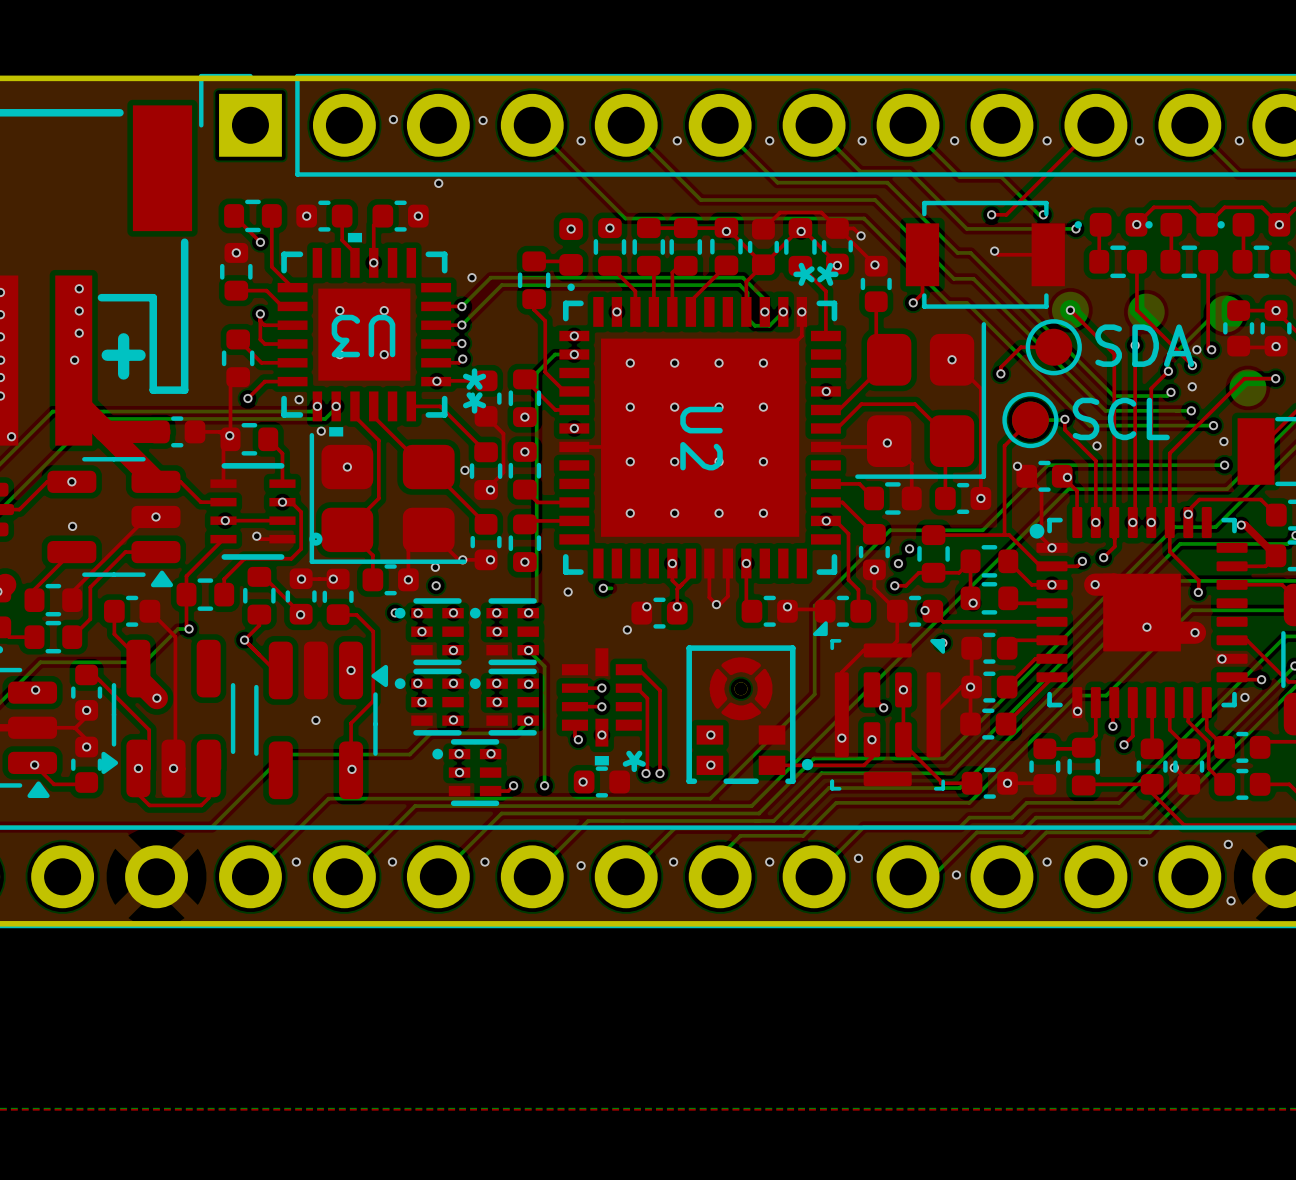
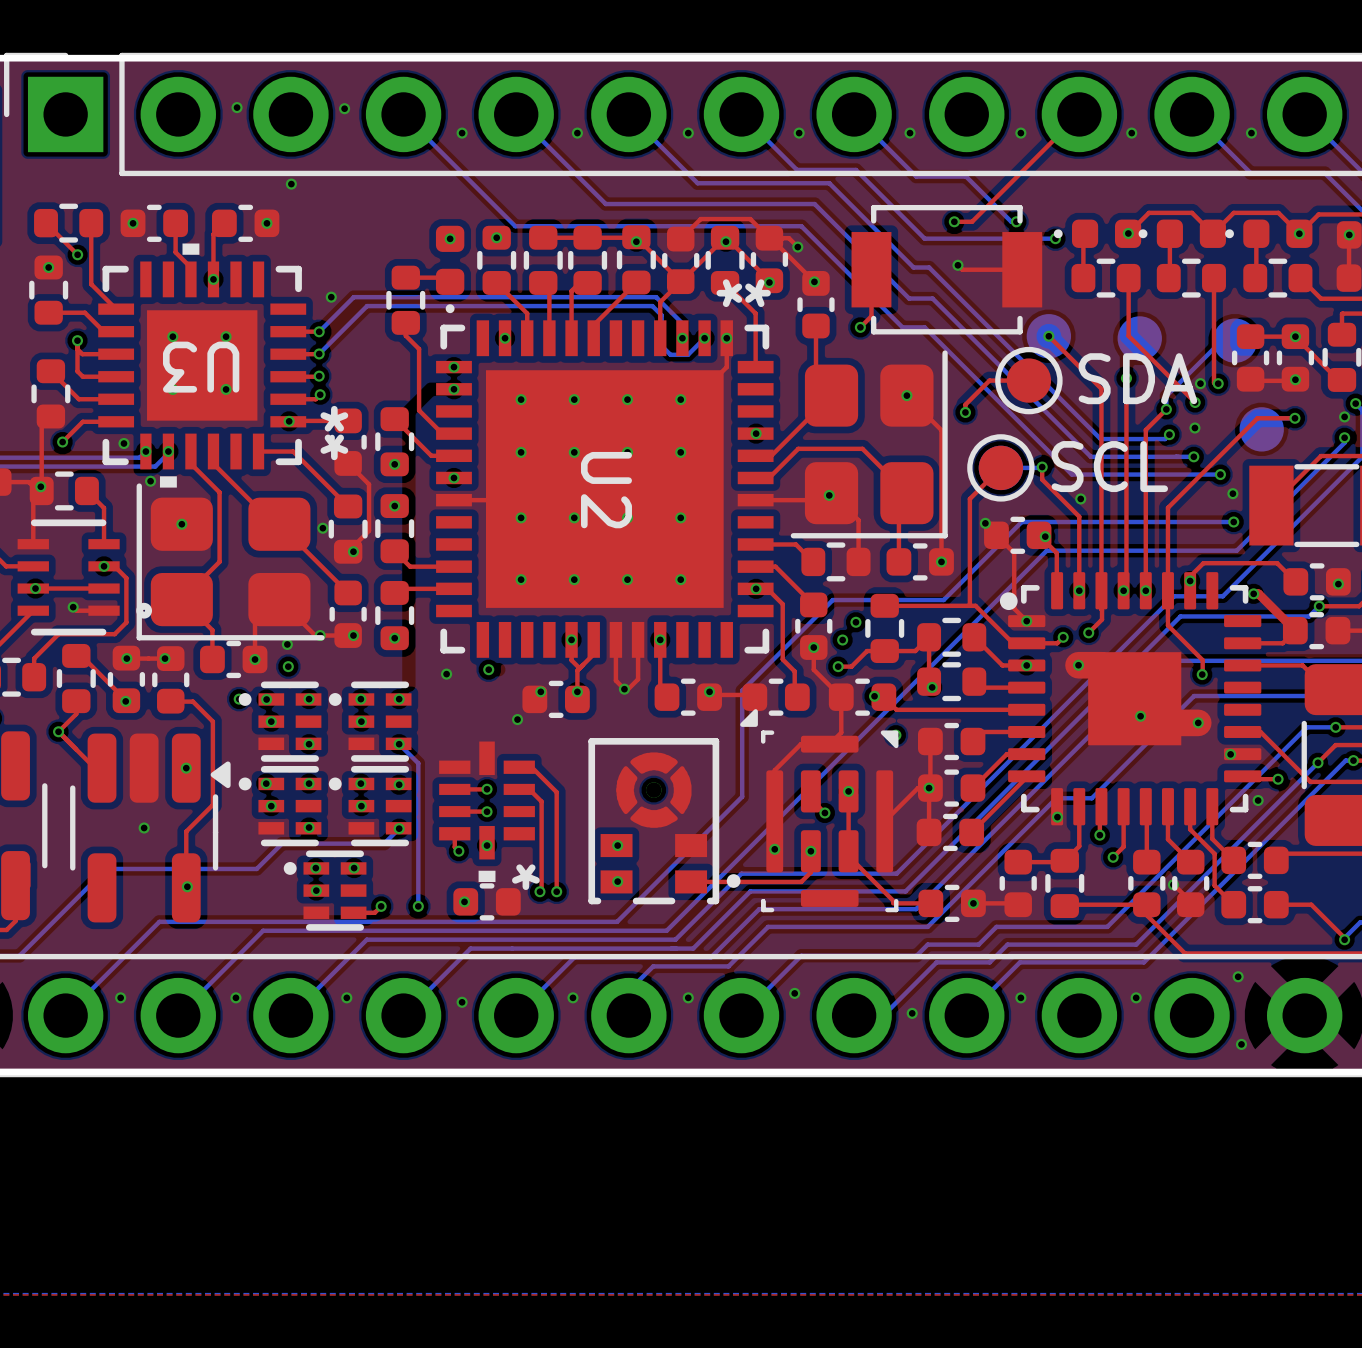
bottom track: (574, 354) (555, 354) (536, 372) (536, 601) -> none
bottom track: (603, 588) (611, 588) -> none

